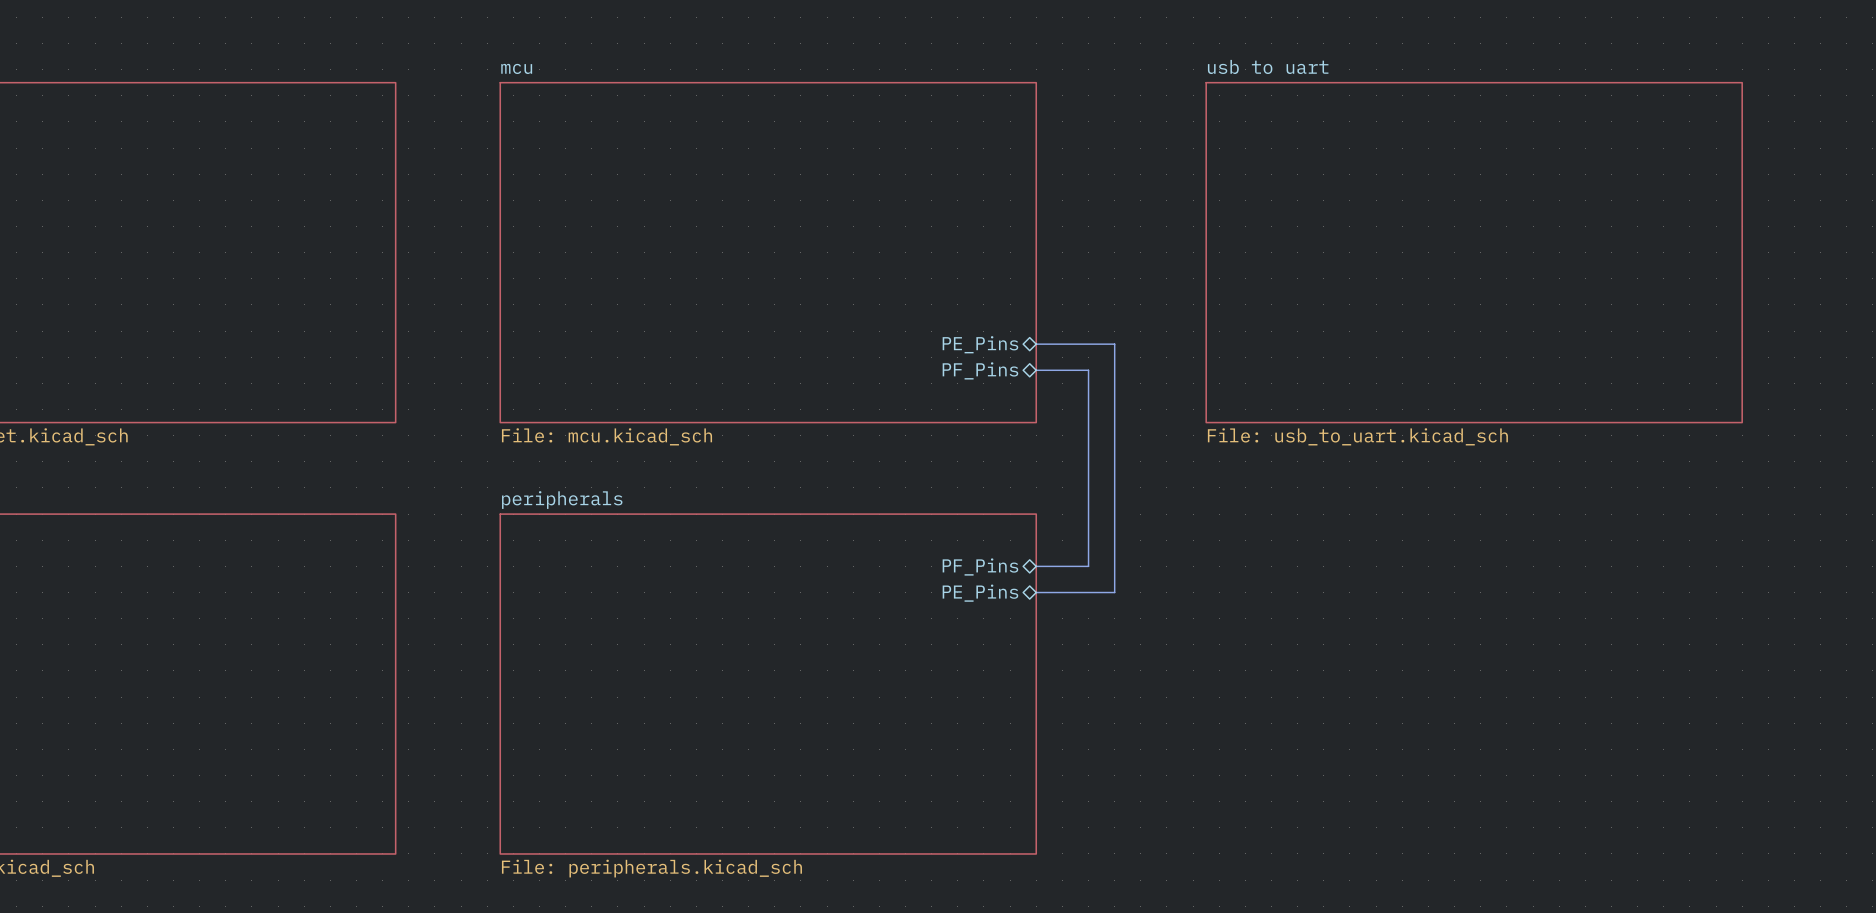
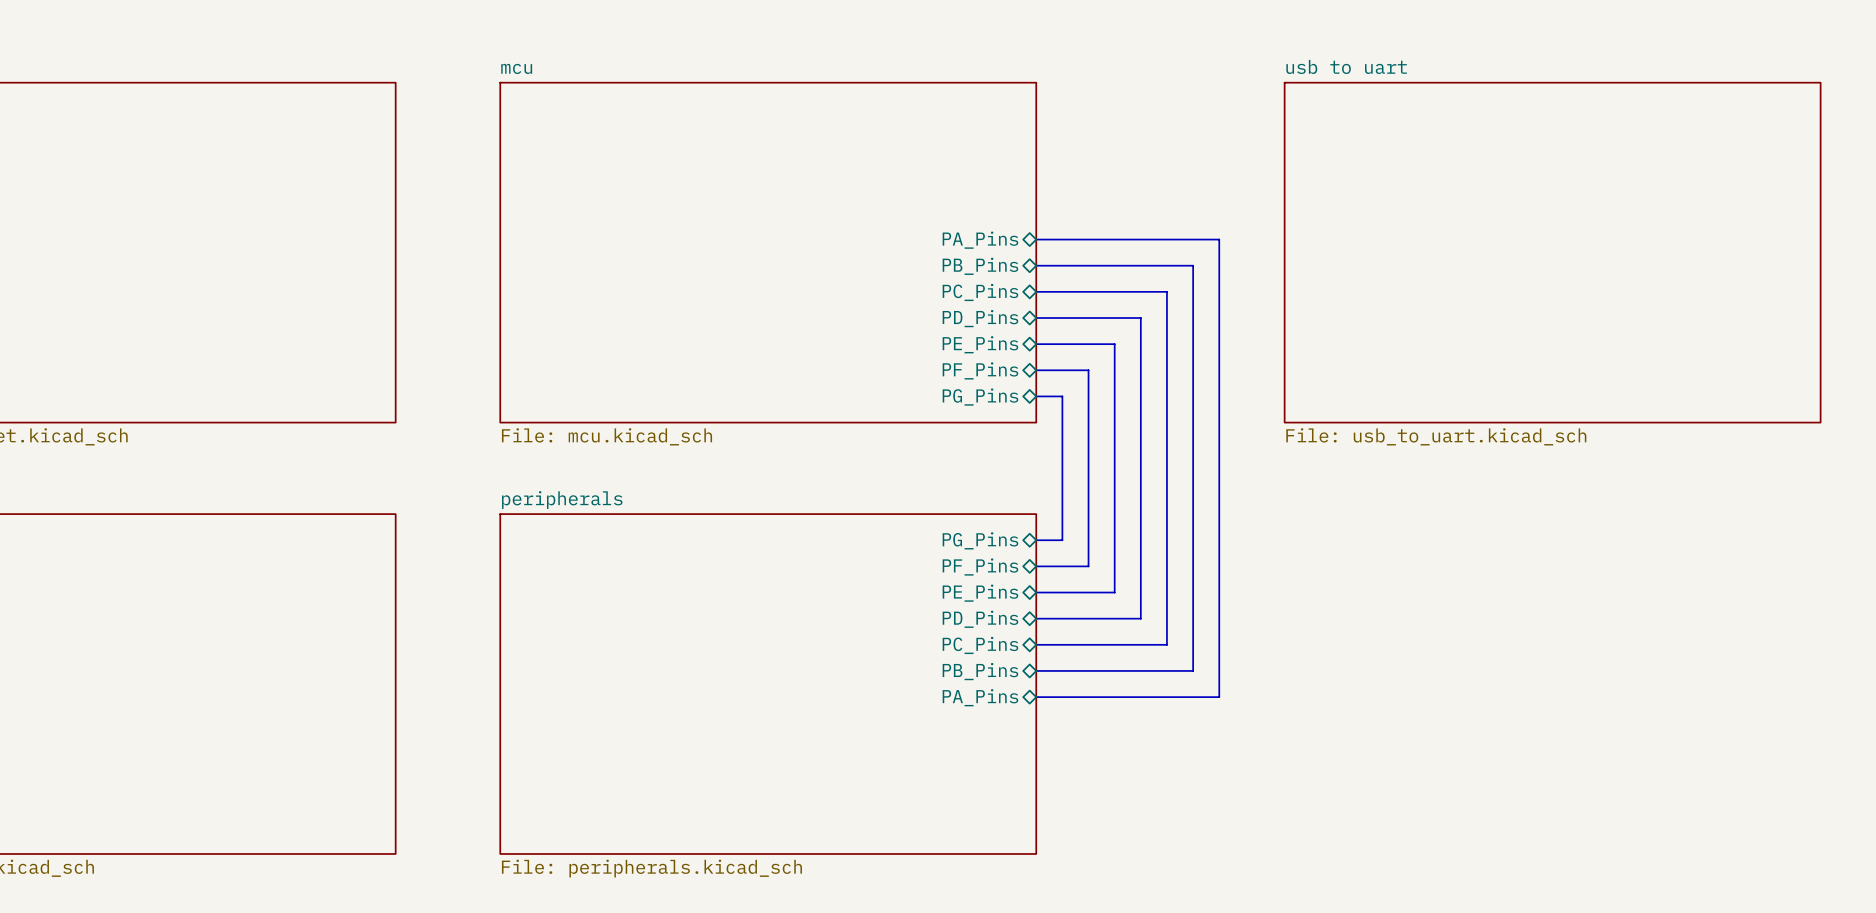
bus: none -> (1036, 239) (1219, 239) (1219, 697) (1036, 697)
sheet pin: none -> PA_Pins (980, 240)
sheet usb to uart position: (1474, 252) -> (1552, 252)
bus: none -> (1036, 265) (1193, 265) (1193, 670) (1036, 670)
sheet pin: none -> PB_Pins (980, 266)
bus: none -> (1036, 291) (1166, 291) (1166, 644) (1036, 644)
sheet pin: none -> PC_Pins (980, 292)
sheet pin: none -> PD_Pins (980, 318)
bus: none -> (1036, 318) (1140, 318) (1140, 618) (1036, 618)
bus: none -> (1036, 396) (1062, 396) (1062, 540) (1036, 540)
sheet pin: none -> PG_Pins (980, 397)
sheet pin: none -> PG_Pins (980, 540)
sheet pin: none -> PD_Pins (980, 619)
sheet pin: none -> PC_Pins (980, 645)
sheet pin: none -> PB_Pins (980, 671)
sheet pin: none -> PA_Pins (980, 697)

